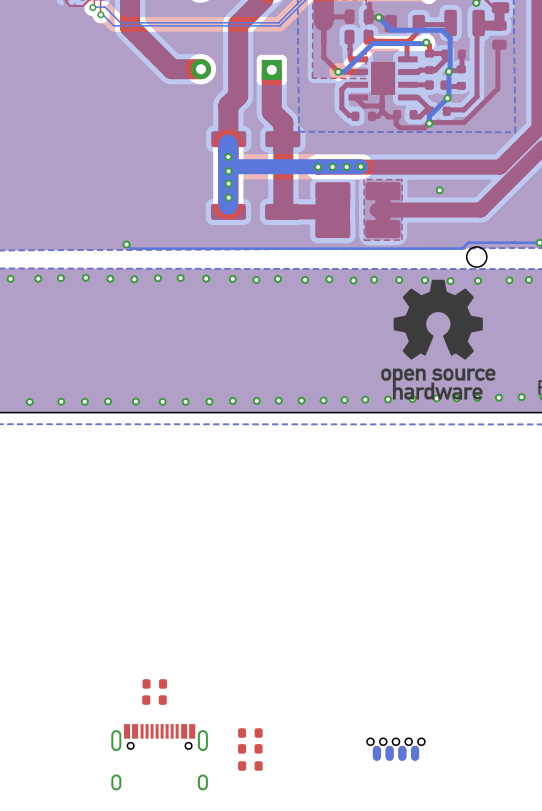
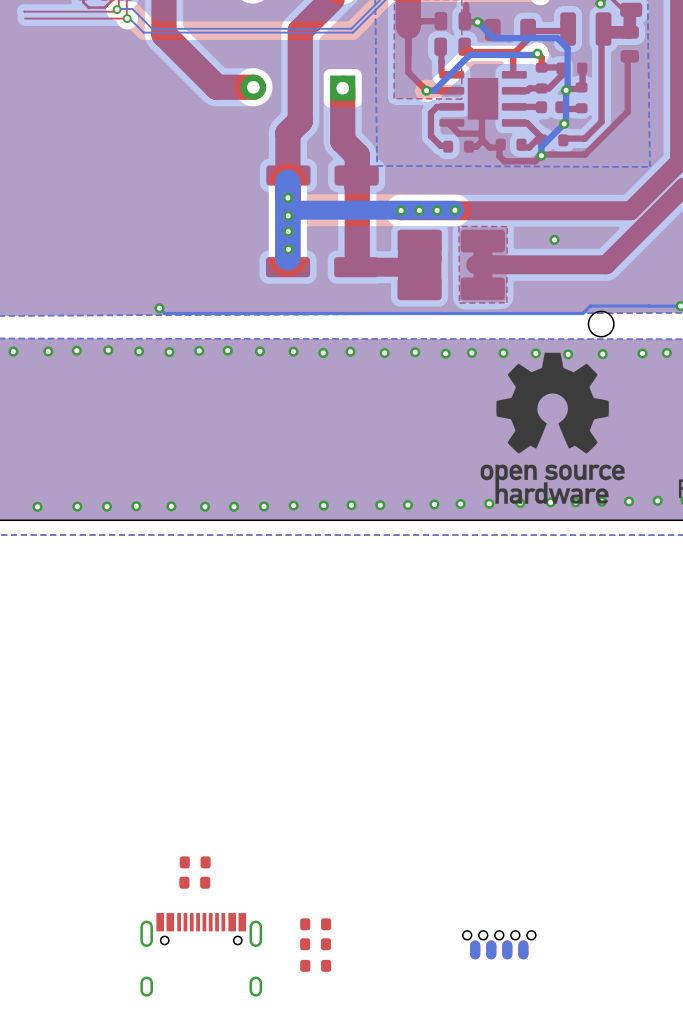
top track: none -> (117, 9) (115, 11) (24, 11)
top track: none -> (127, 18) (25, 18)

